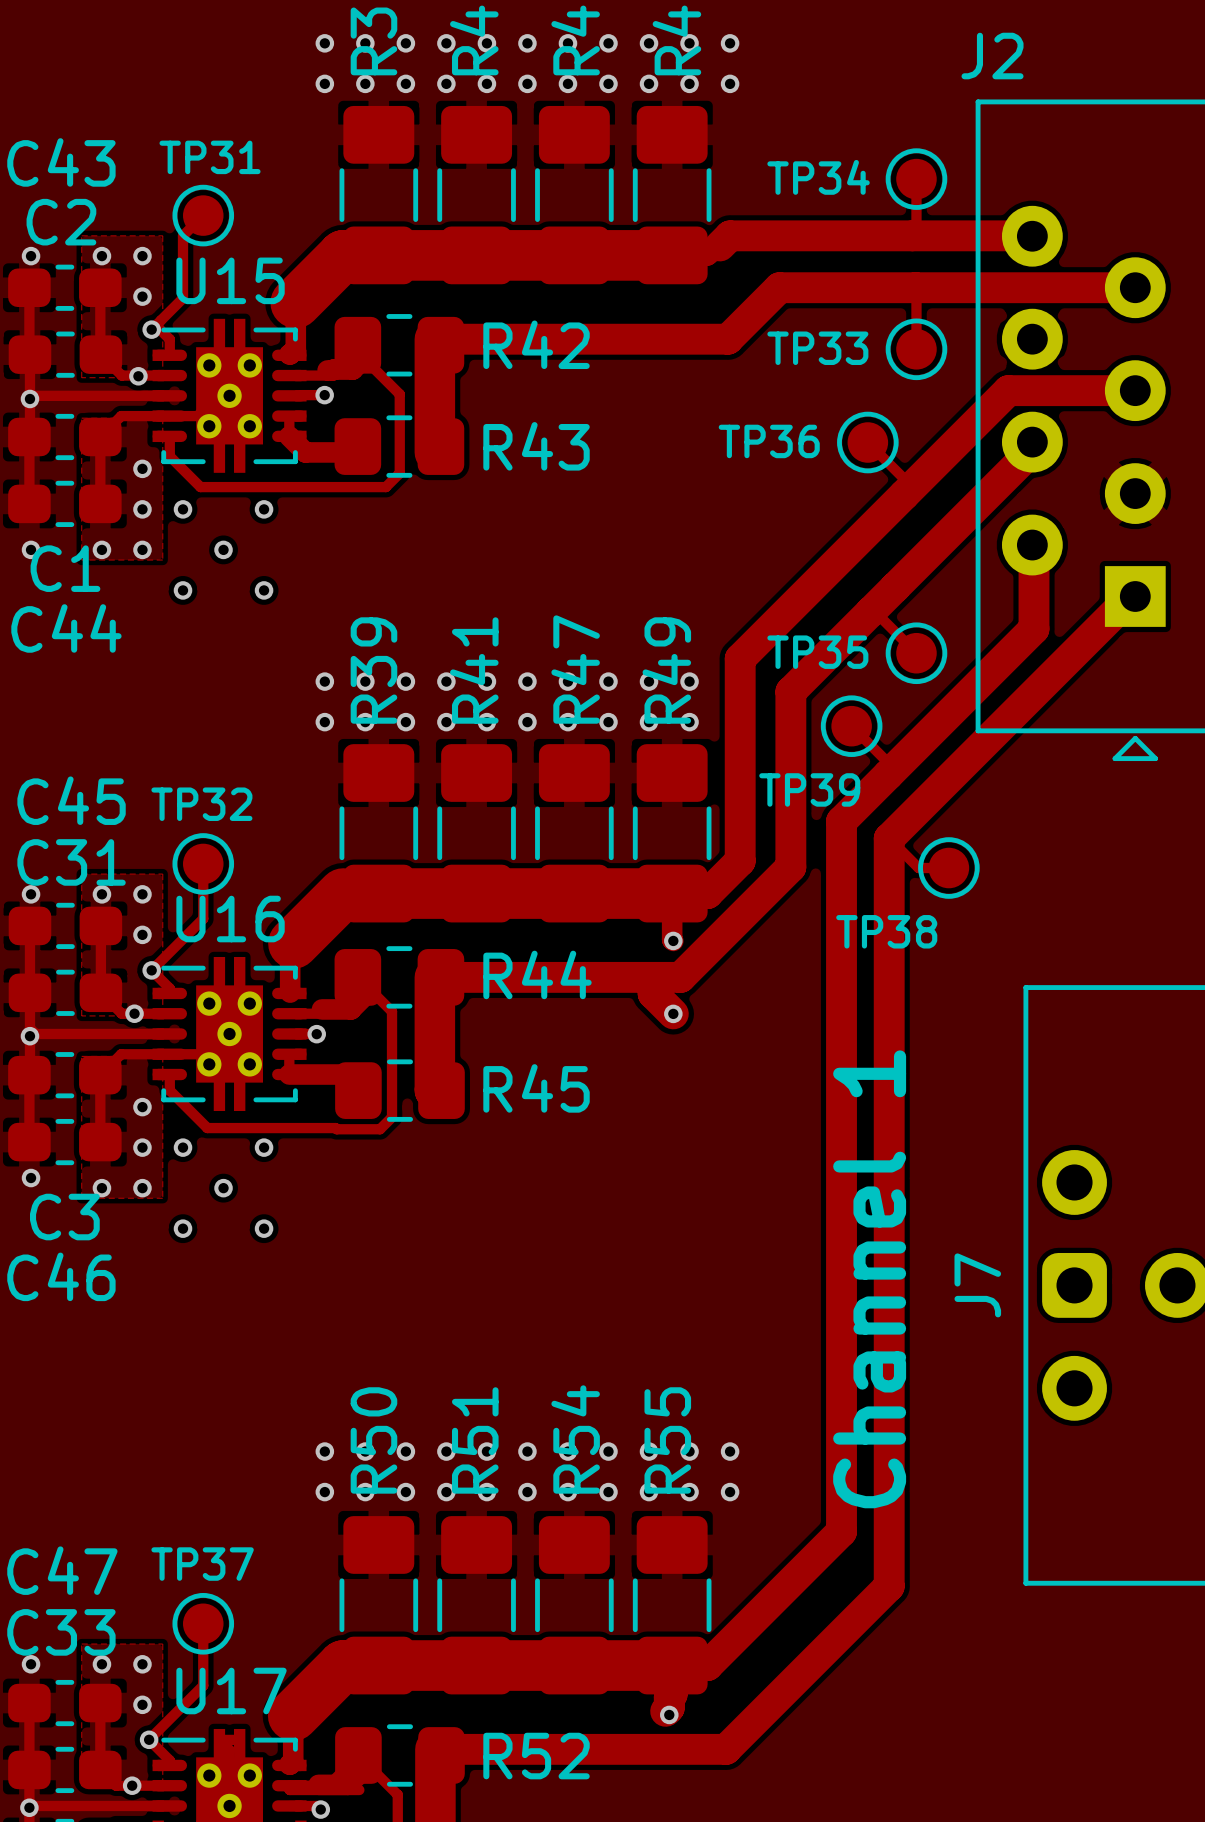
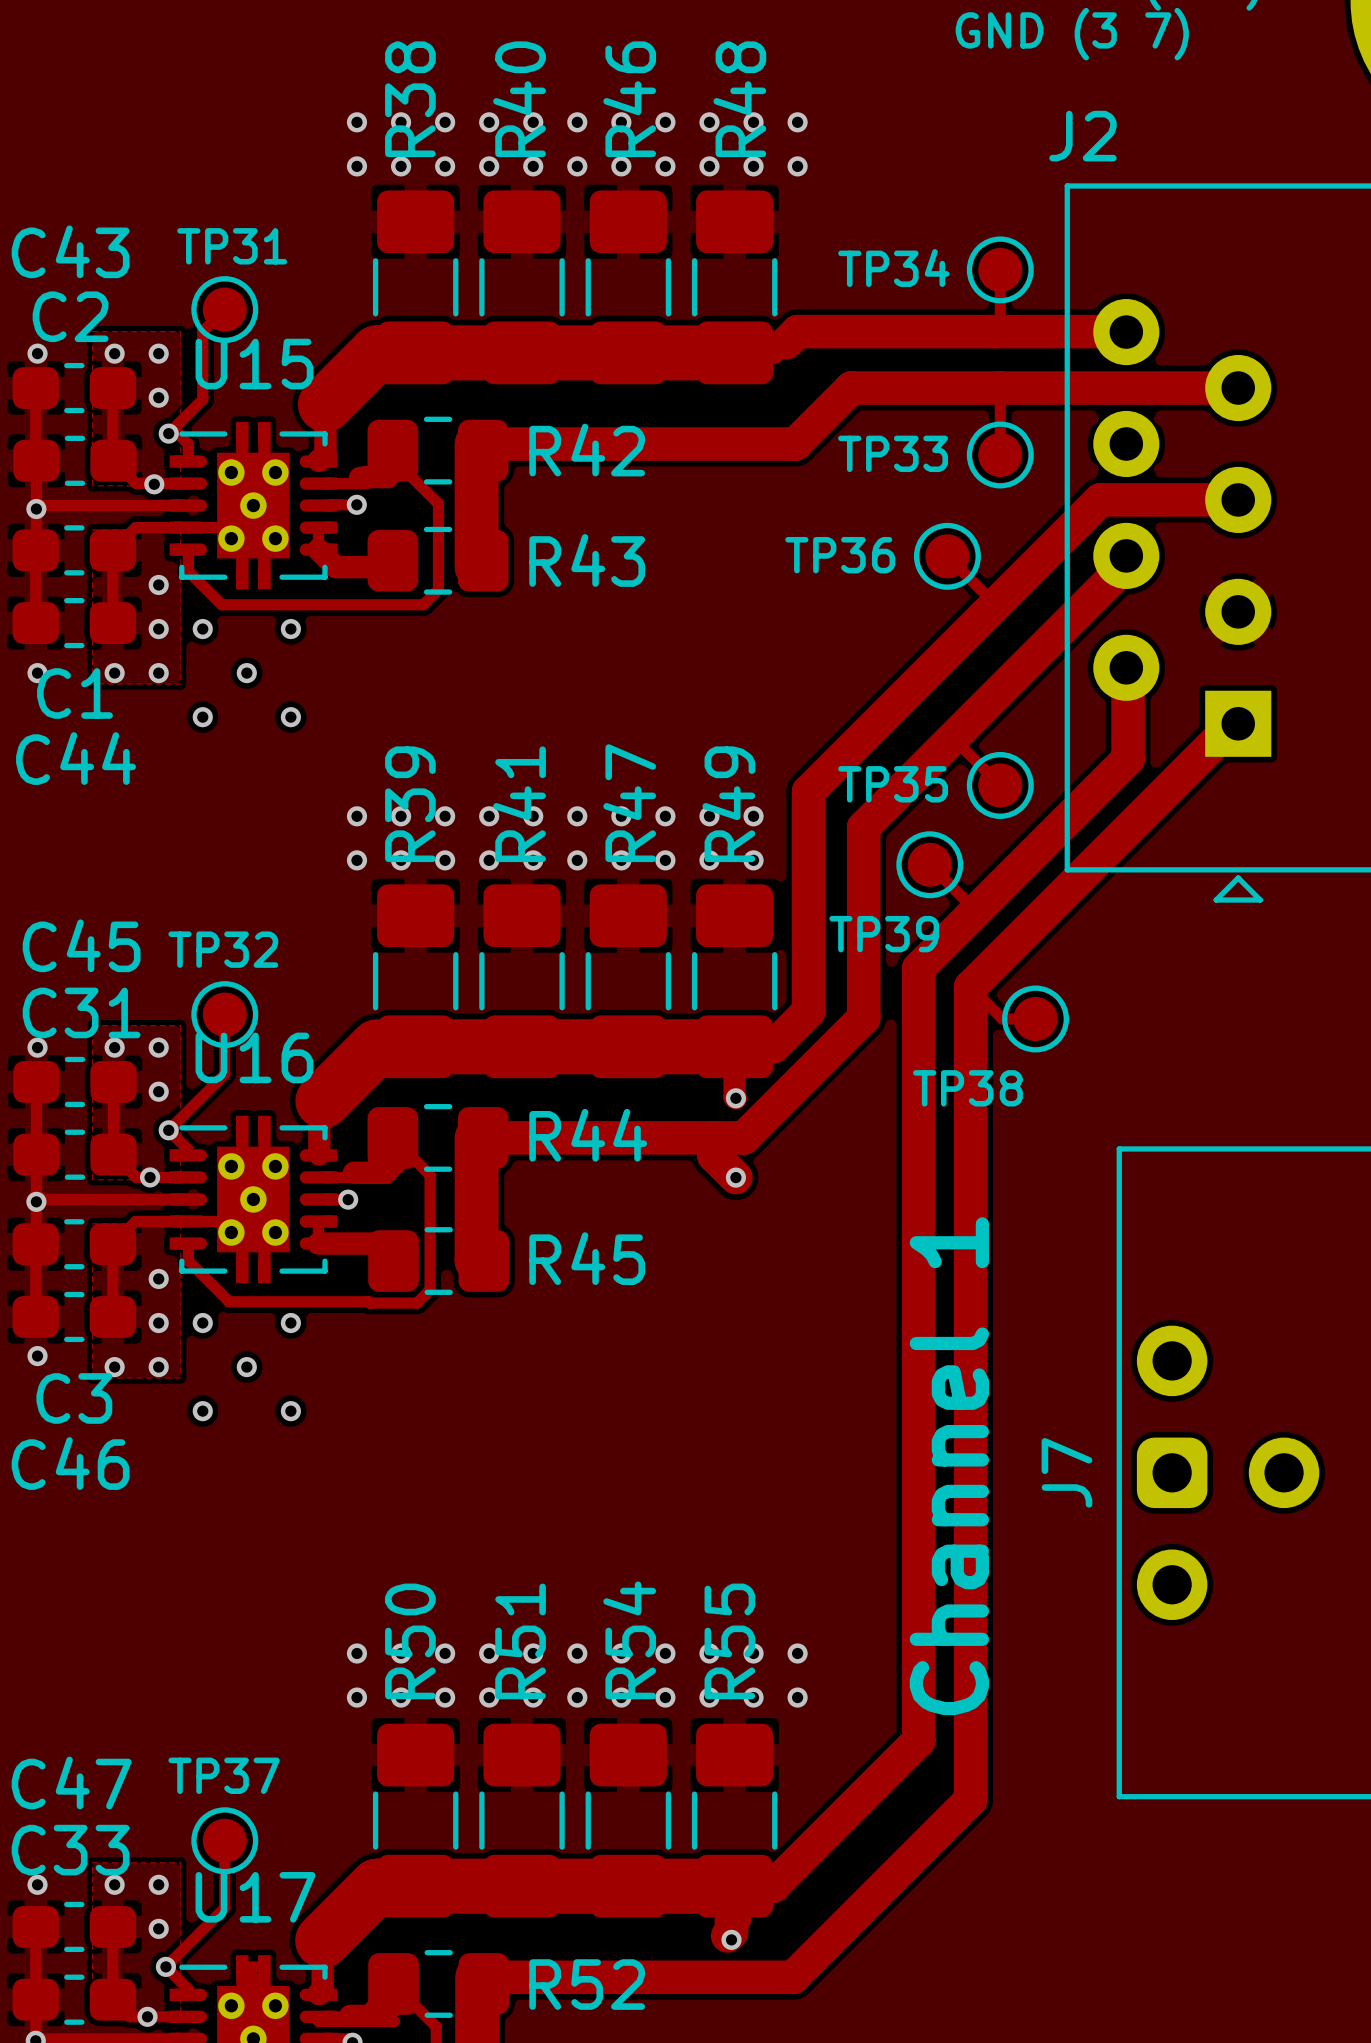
U15 name position: U15 (230, 280) -> U15 (254, 364)
U16 name position: U16 (230, 919) -> U16 (254, 1057)
U17 name position: U17 (231, 1690) -> U17 (255, 1897)

